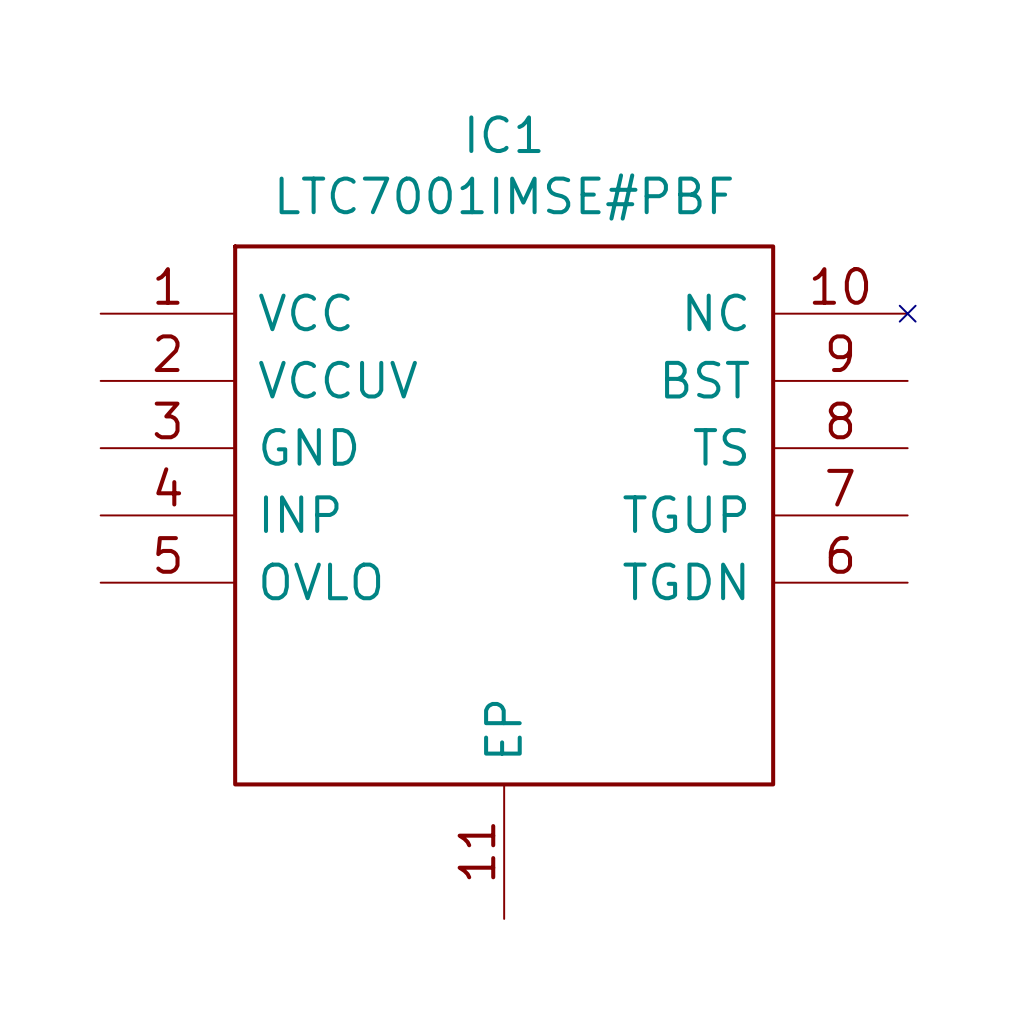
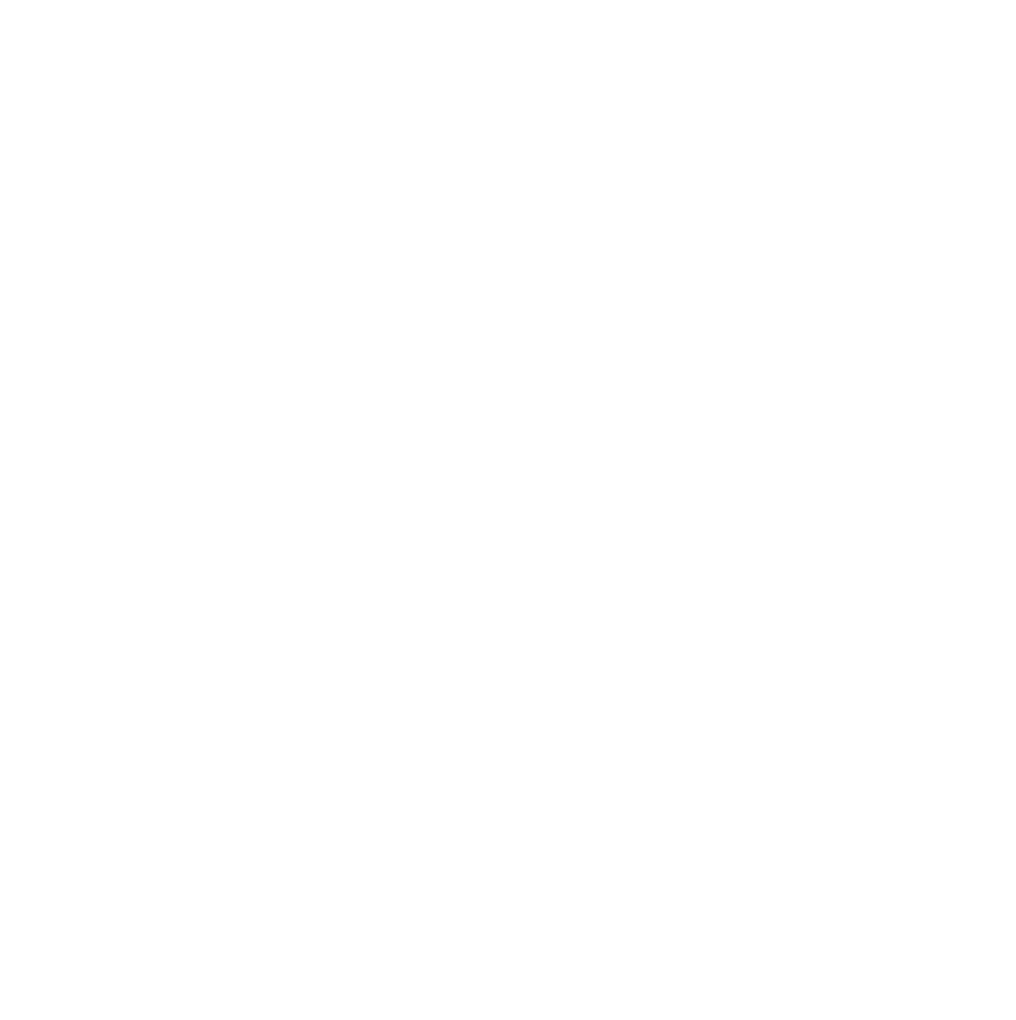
IC1: LTC7001IMSE#PBF (508, 581) -> none

